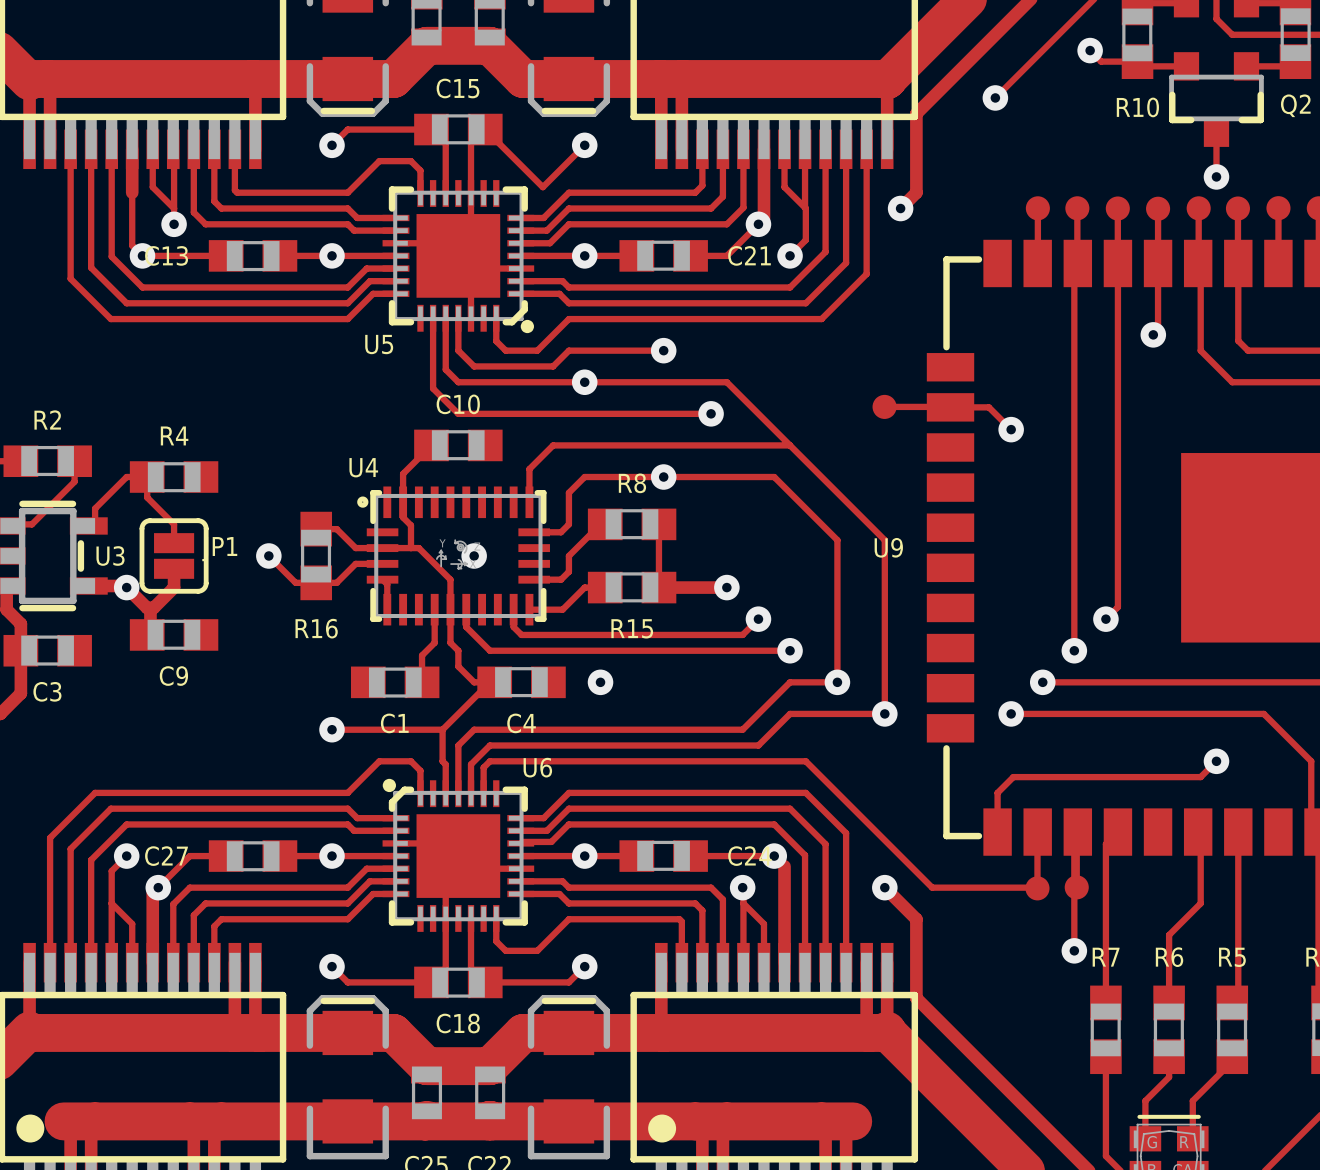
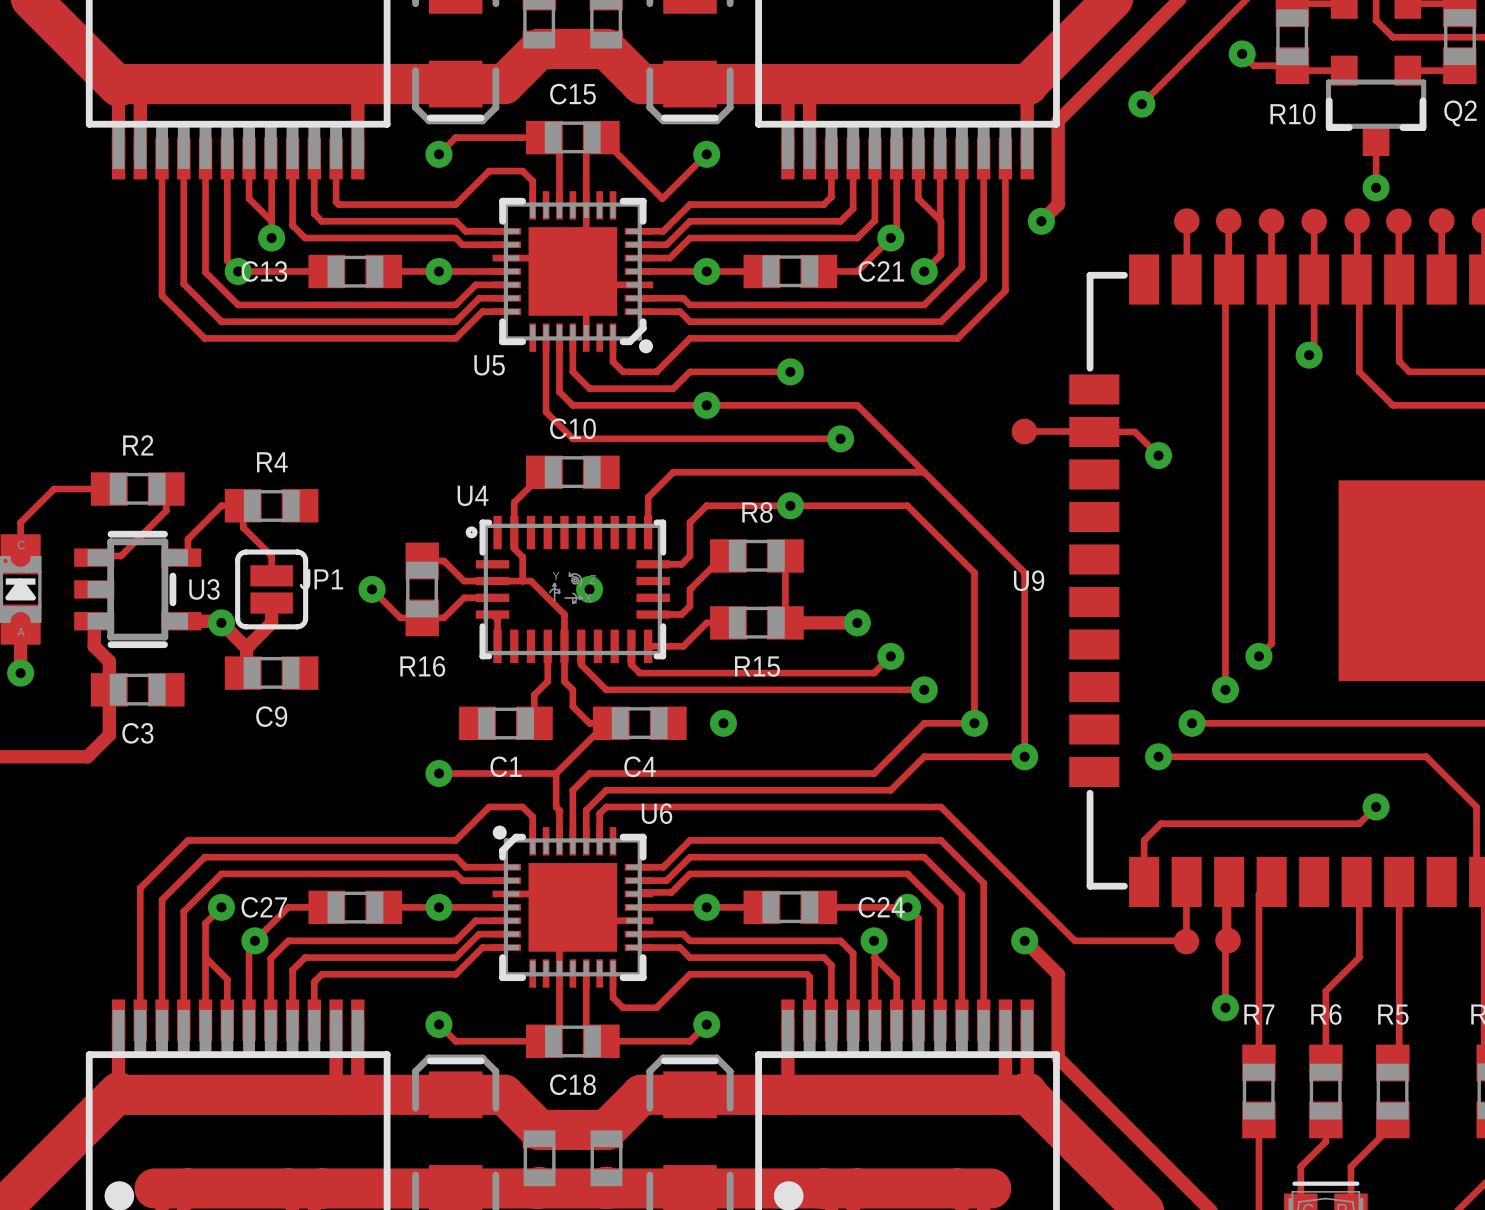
track width: thick (132, 149) (132, 192) -> thin (227, 158) (227, 204)
track width: thick (763, 149) (763, 218) -> thin (896, 158) (896, 232)
track width: thick (784, 866) (784, 962) -> thin (918, 918) (918, 1020)
track width: thick (152, 893) (152, 962) -> thin (249, 946) (249, 1020)

